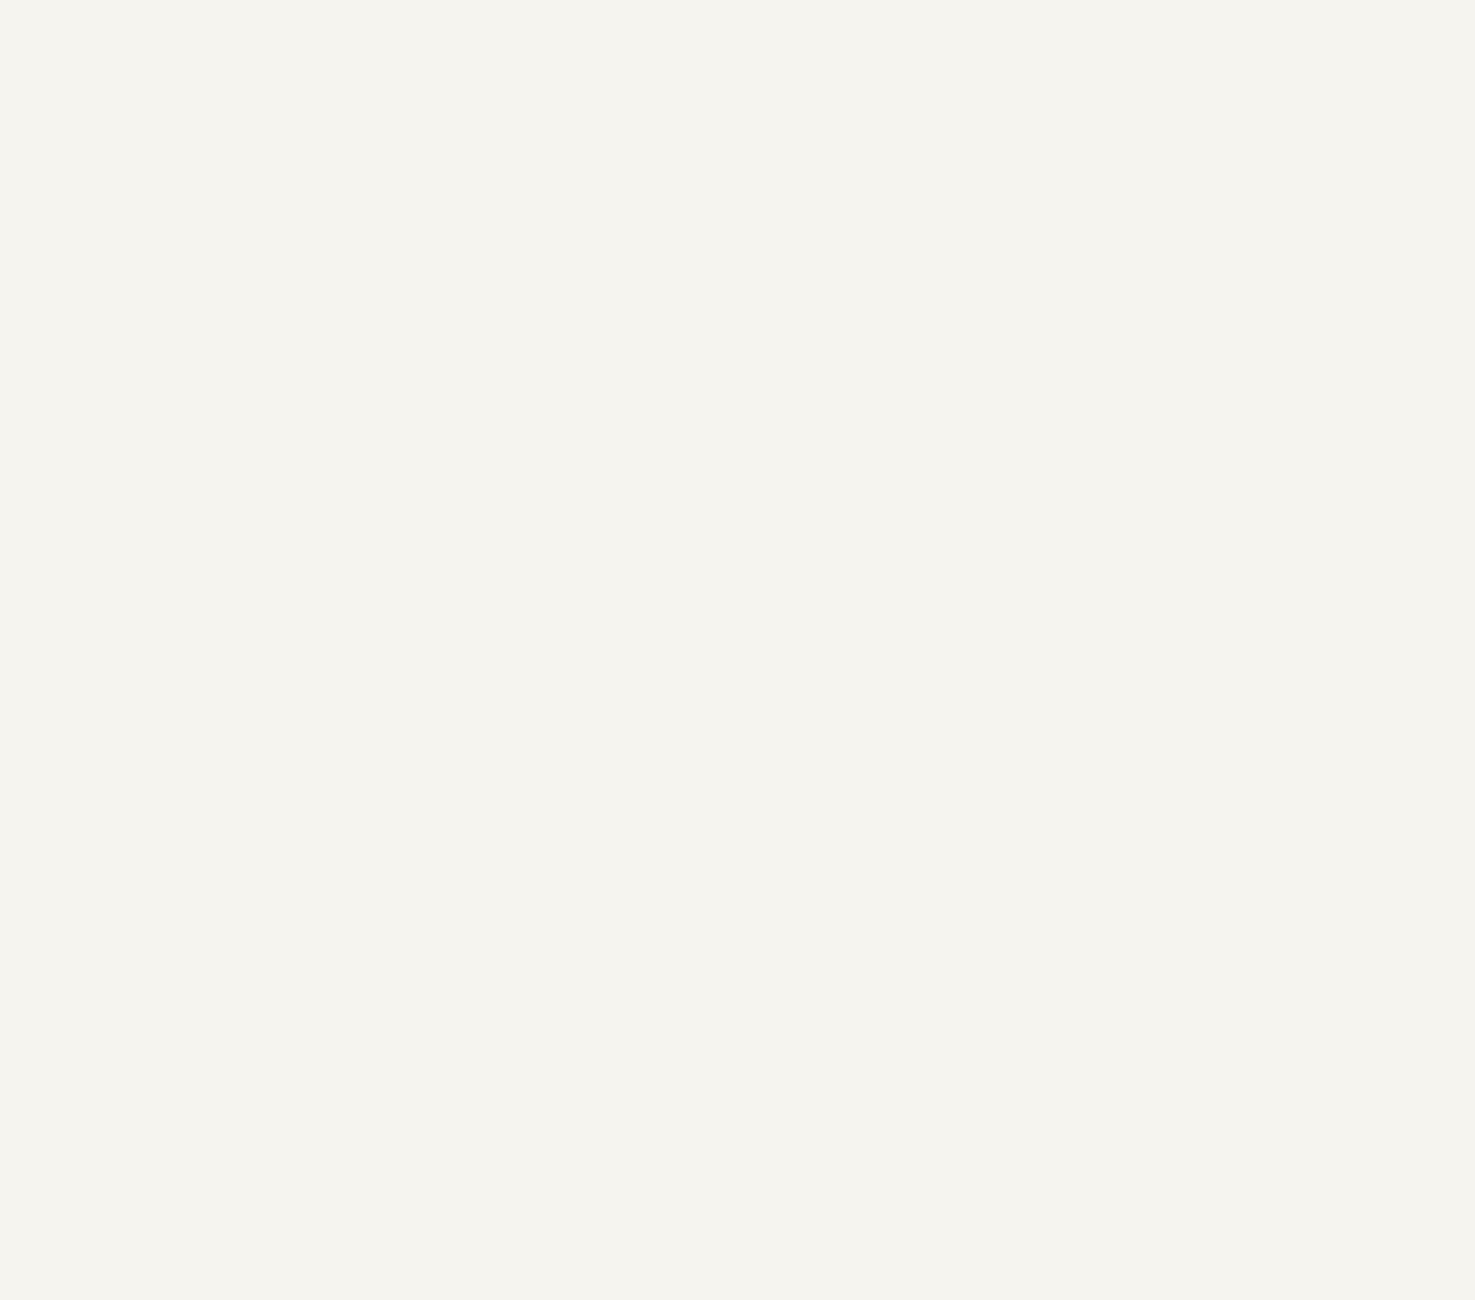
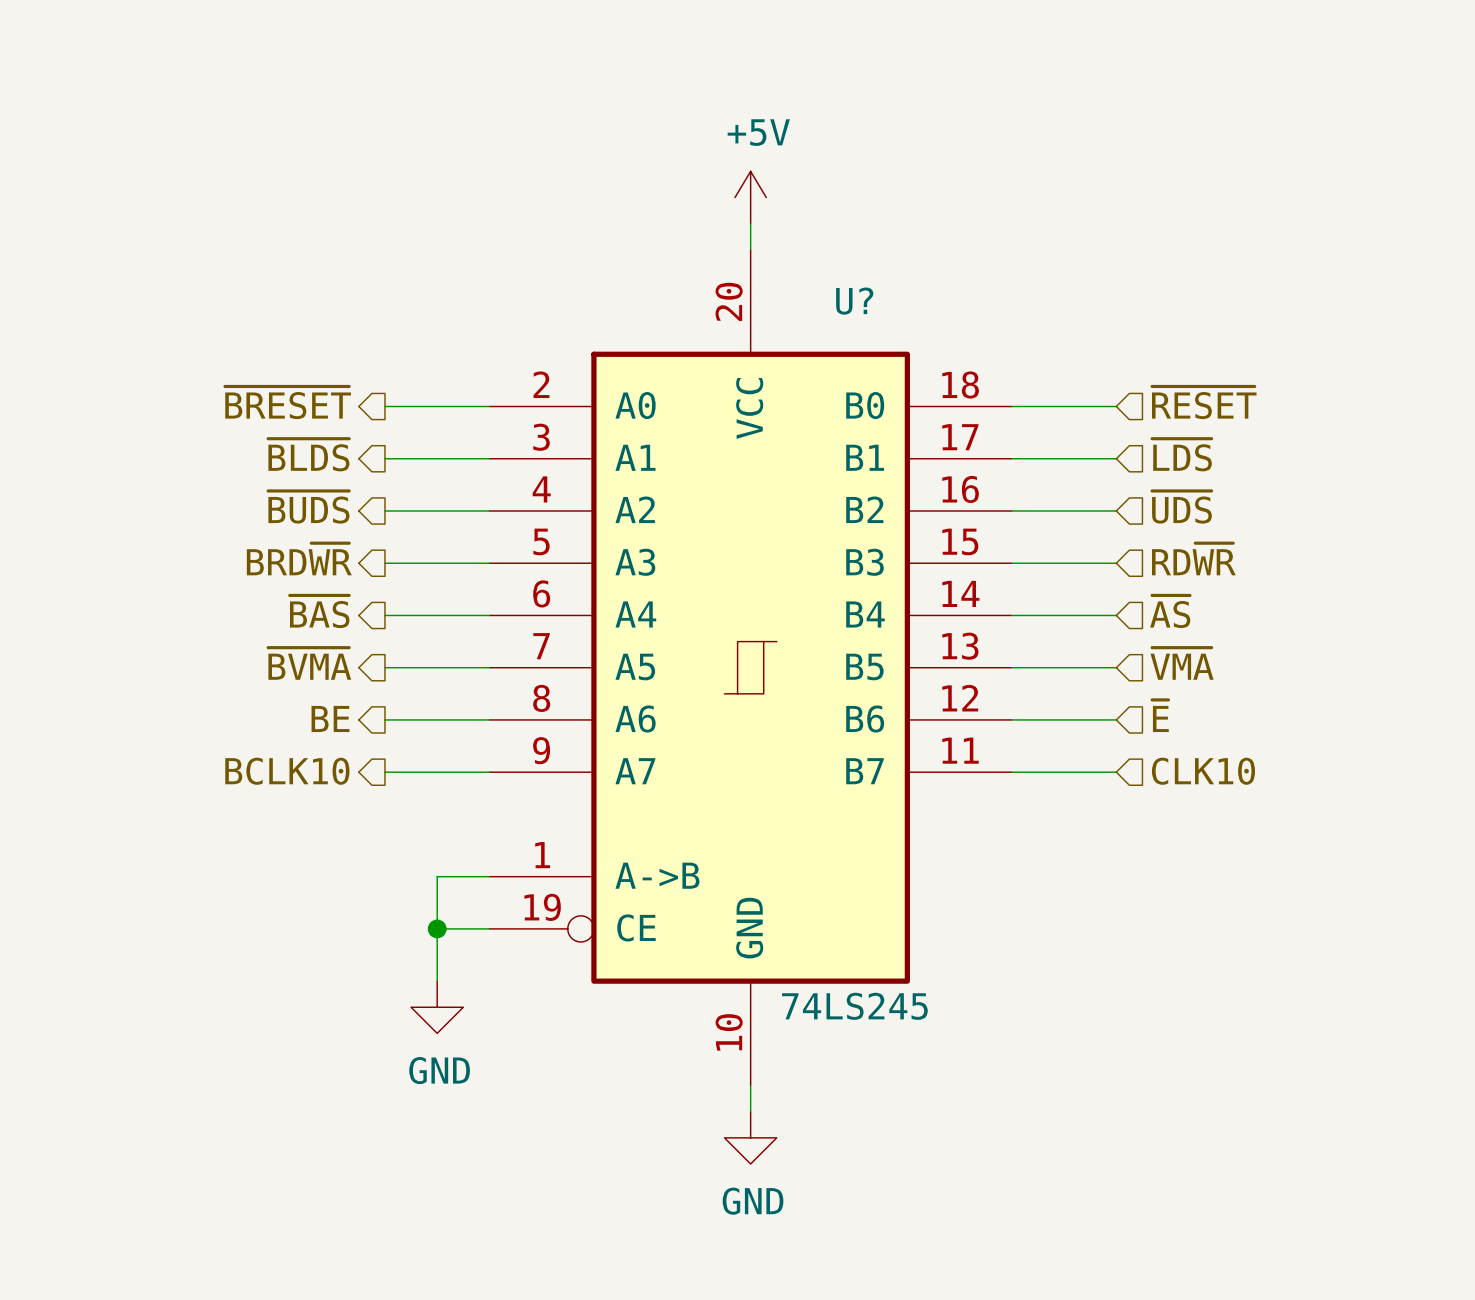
power symbol: none -> +5V (750, 197)
wire: none -> (750, 223) (750, 249)
hierarchical label: none -> ~{BRESET} (287, 402)
hierarchical label: none -> ~{RESET} (1204, 402)
wire: none -> (384, 406) (489, 406)
wire: none -> (1011, 406) (1116, 406)
hierarchical label: none -> ~{BLDS} (308, 455)
hierarchical label: none -> ~{LDS} (1181, 455)
wire: none -> (384, 458) (489, 458)
wire: none -> (1011, 458) (1116, 458)
hierarchical label: none -> ~{BUDS} (308, 507)
hierarchical label: none -> ~{UDS} (1181, 507)
wire: none -> (384, 510) (489, 510)
wire: none -> (1011, 510) (1116, 510)
hierarchical label: none -> BRD~{WR} (299, 559)
hierarchical label: none -> RD~{WR} (1193, 559)
wire: none -> (384, 563) (489, 563)
wire: none -> (1011, 563) (1116, 563)
hierarchical label: none -> ~{BAS} (319, 611)
hierarchical label: none -> ~{AS} (1170, 611)
wire: none -> (384, 615) (489, 615)
wire: none -> (1011, 615) (1116, 615)
hierarchical label: none -> ~{BVMA} (309, 663)
hierarchical label: none -> ~{VMA} (1182, 663)
wire: none -> (384, 667) (489, 667)
U?: none -> 74LS245 (750, 667)
wire: none -> (1011, 667) (1116, 667)
hierarchical label: none -> ~{E} (1160, 715)
hierarchical label: none -> BE (330, 718)
wire: none -> (384, 719) (489, 719)
wire: none -> (1011, 719) (1116, 719)
hierarchical label: none -> BCLK10 (287, 771)
hierarchical label: none -> CLK10 (1203, 771)
wire: none -> (384, 772) (489, 772)
wire: none -> (1011, 772) (1116, 772)
wire: none -> (489, 876) (437, 876) (437, 981)
wire: none -> (437, 928) (489, 928)
junction: none -> (437, 928)
power symbol: none -> GND (437, 1007)
wire: none -> (750, 1085) (750, 1111)
power symbol: none -> GND (750, 1137)

